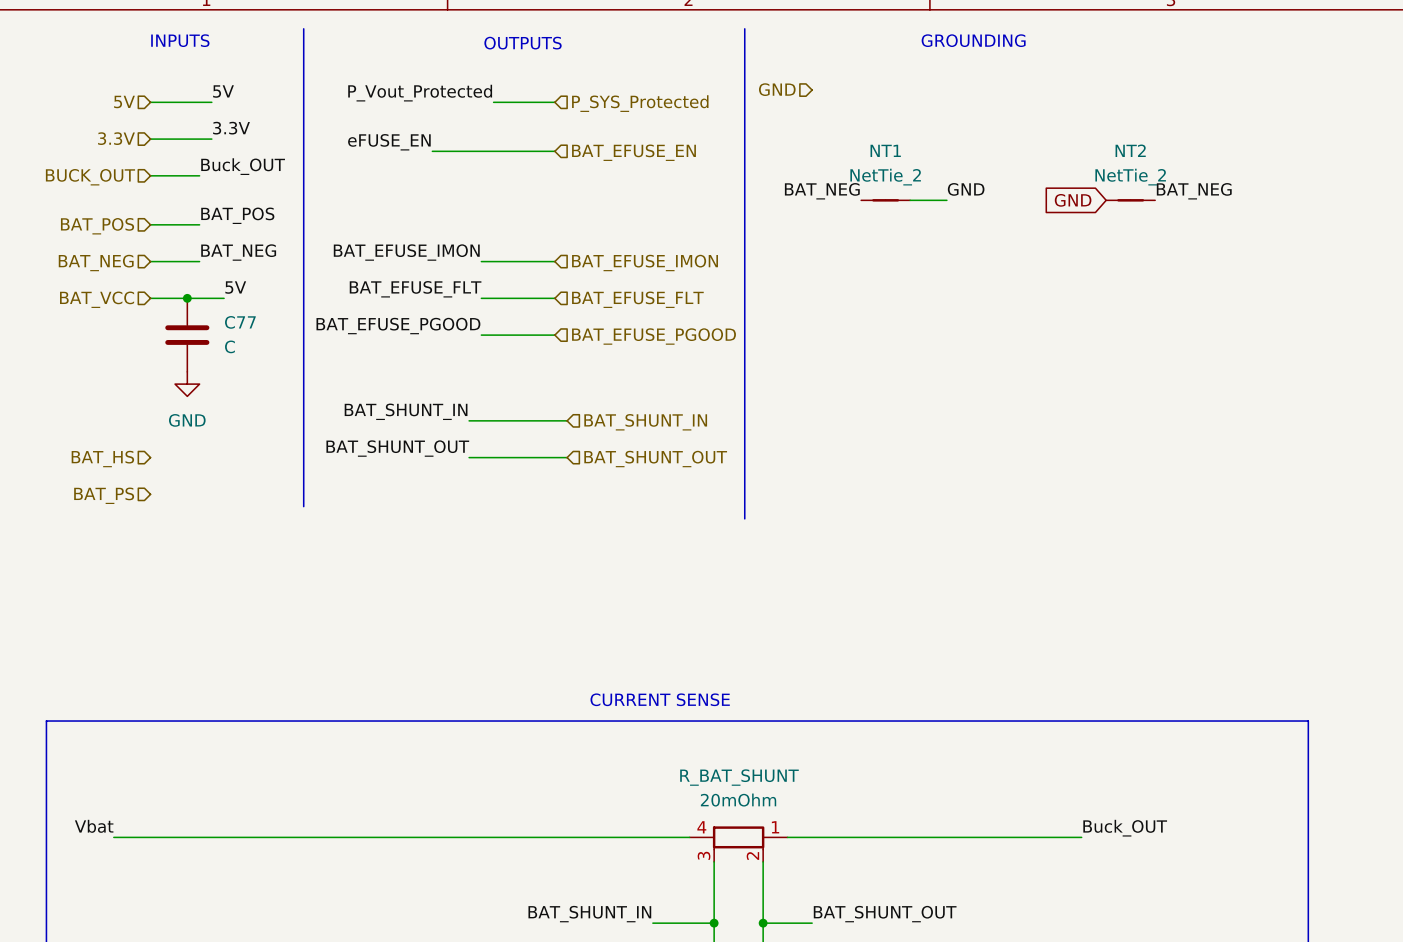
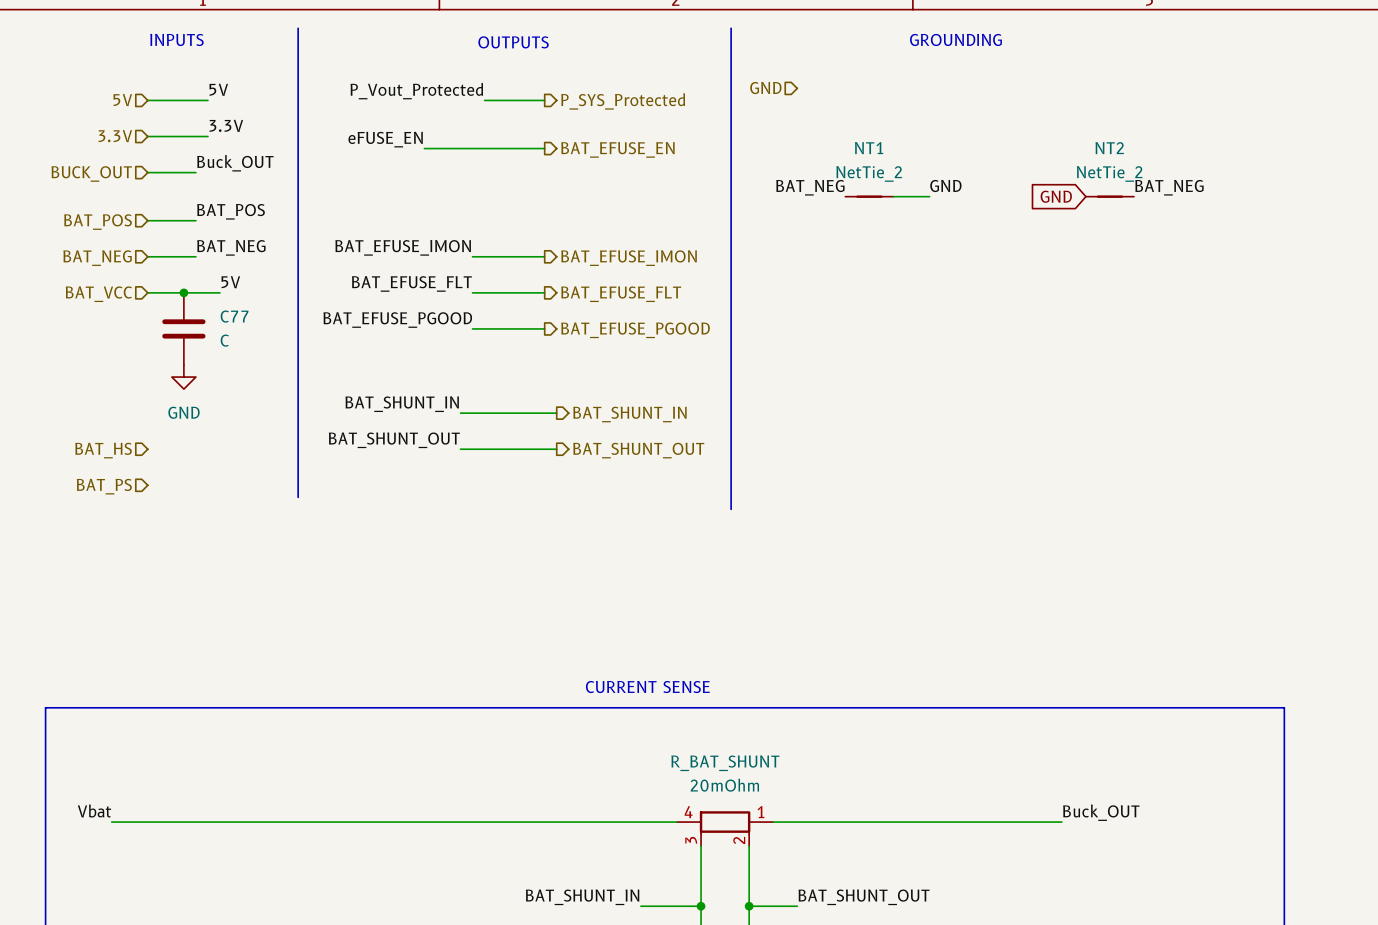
hierarchical label shape: input (640, 103) -> output (623, 101)
hierarchical label shape: input (633, 152) -> output (617, 149)
hierarchical label shape: input (645, 263) -> output (629, 258)
hierarchical label shape: input (637, 299) -> output (621, 294)
hierarchical label shape: input (654, 336) -> output (635, 330)
hierarchical label shape: input (645, 422) -> output (629, 414)
hierarchical label shape: input (655, 459) -> output (638, 450)

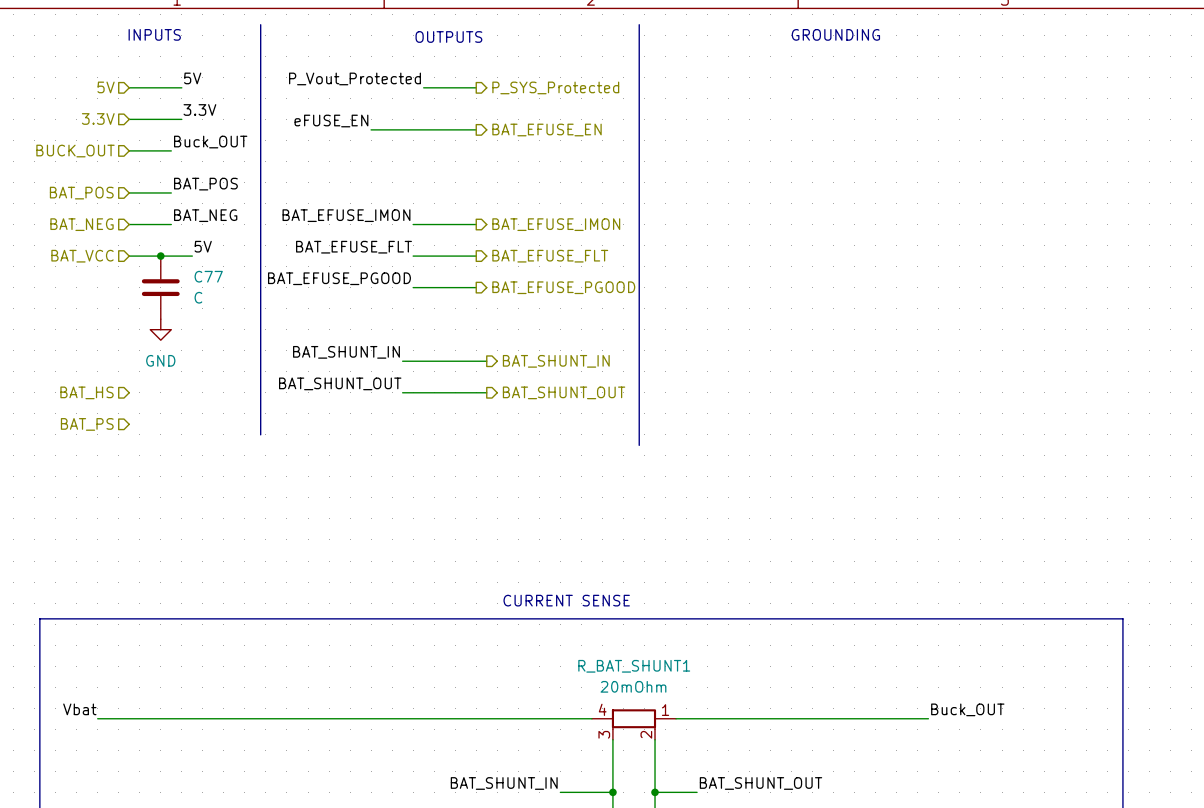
hierarchical label: GND (765, 88) -> none
label: GND (945, 186) -> none
label: BAT_NEG (810, 187) -> none
label: BAT_NEG (1169, 187) -> none
NT1: NetTie_2 (869, 196) -> none
wire: (893, 196) (929, 196) -> none
global label: GND (1056, 196) -> none
NT2: NetTie_2 (1109, 196) -> none
R_BAT_SHUNT name: R_BAT_SHUNT (725, 763) -> R_BAT_SHUNT1 (634, 666)

